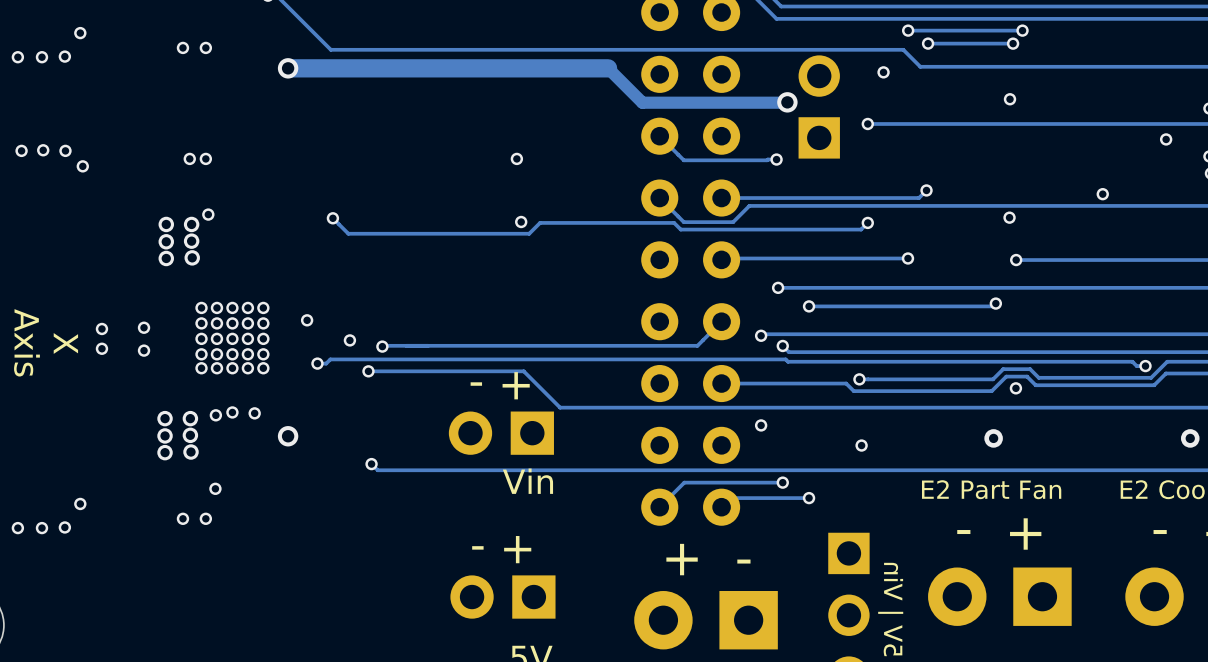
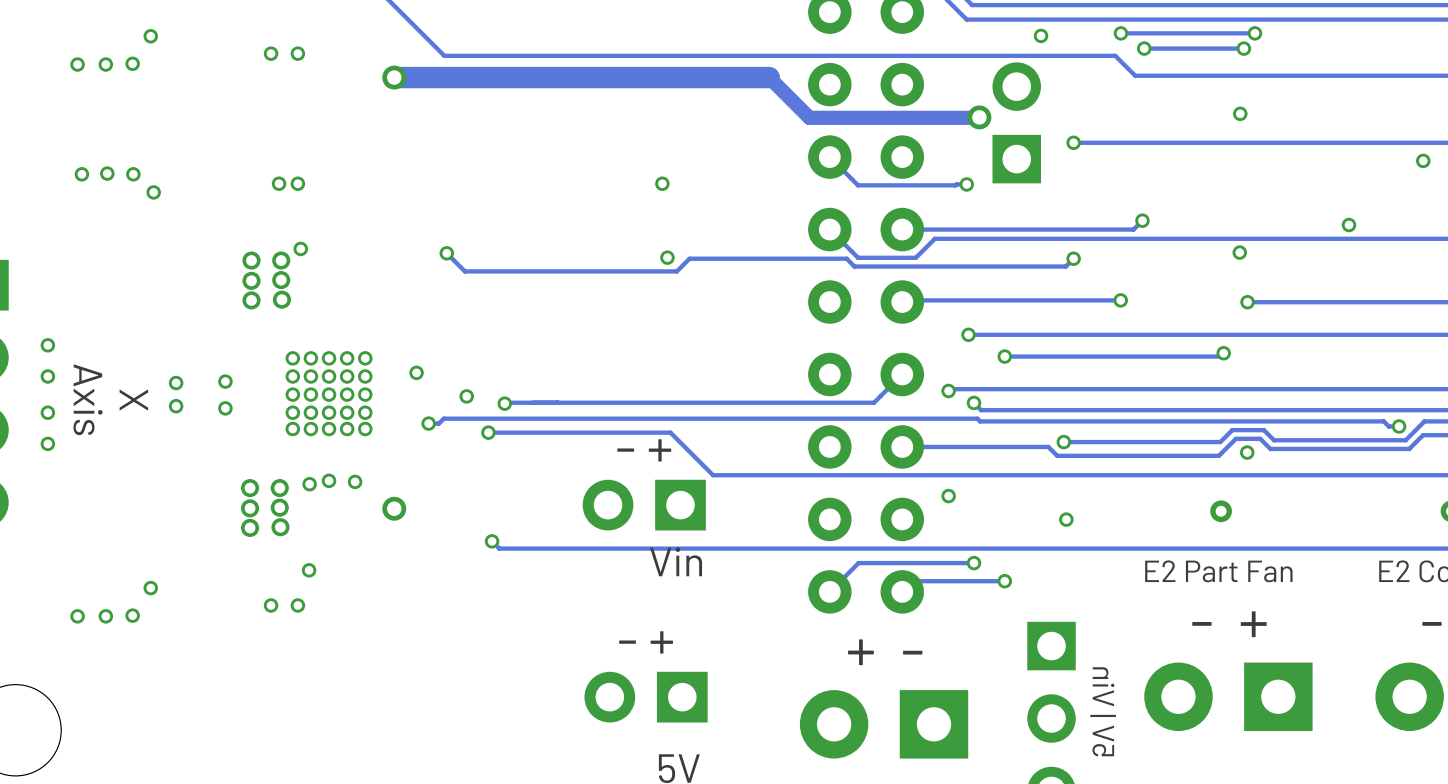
via: none -> (1041, 35)
via: (883, 72) -> none

